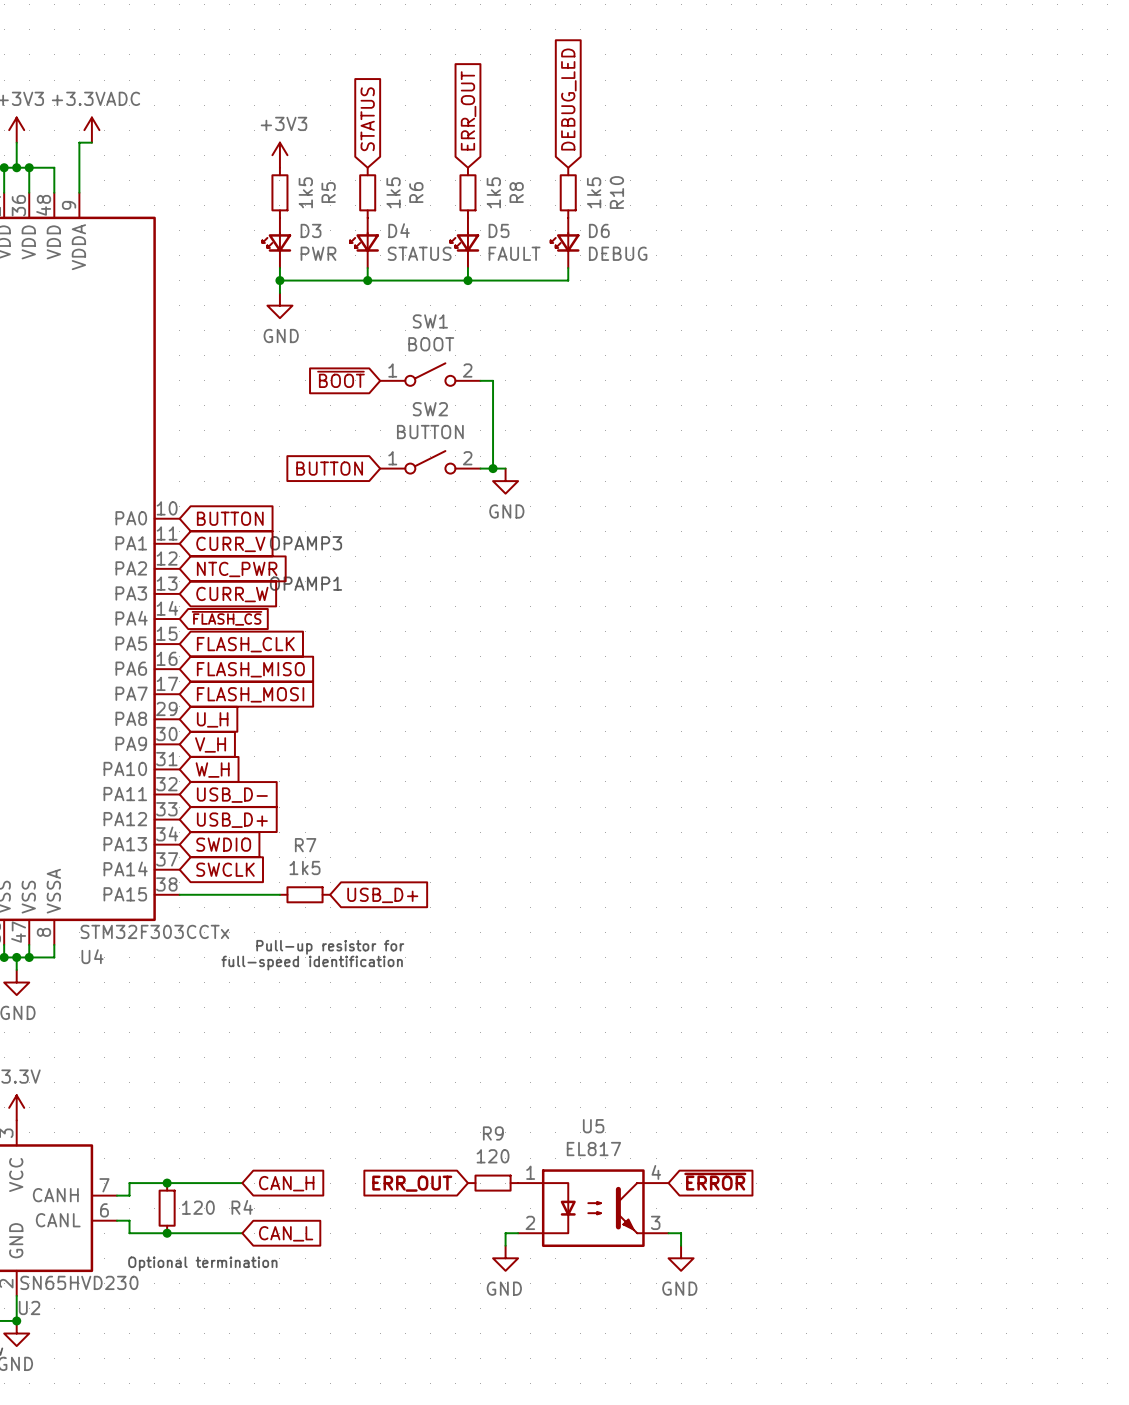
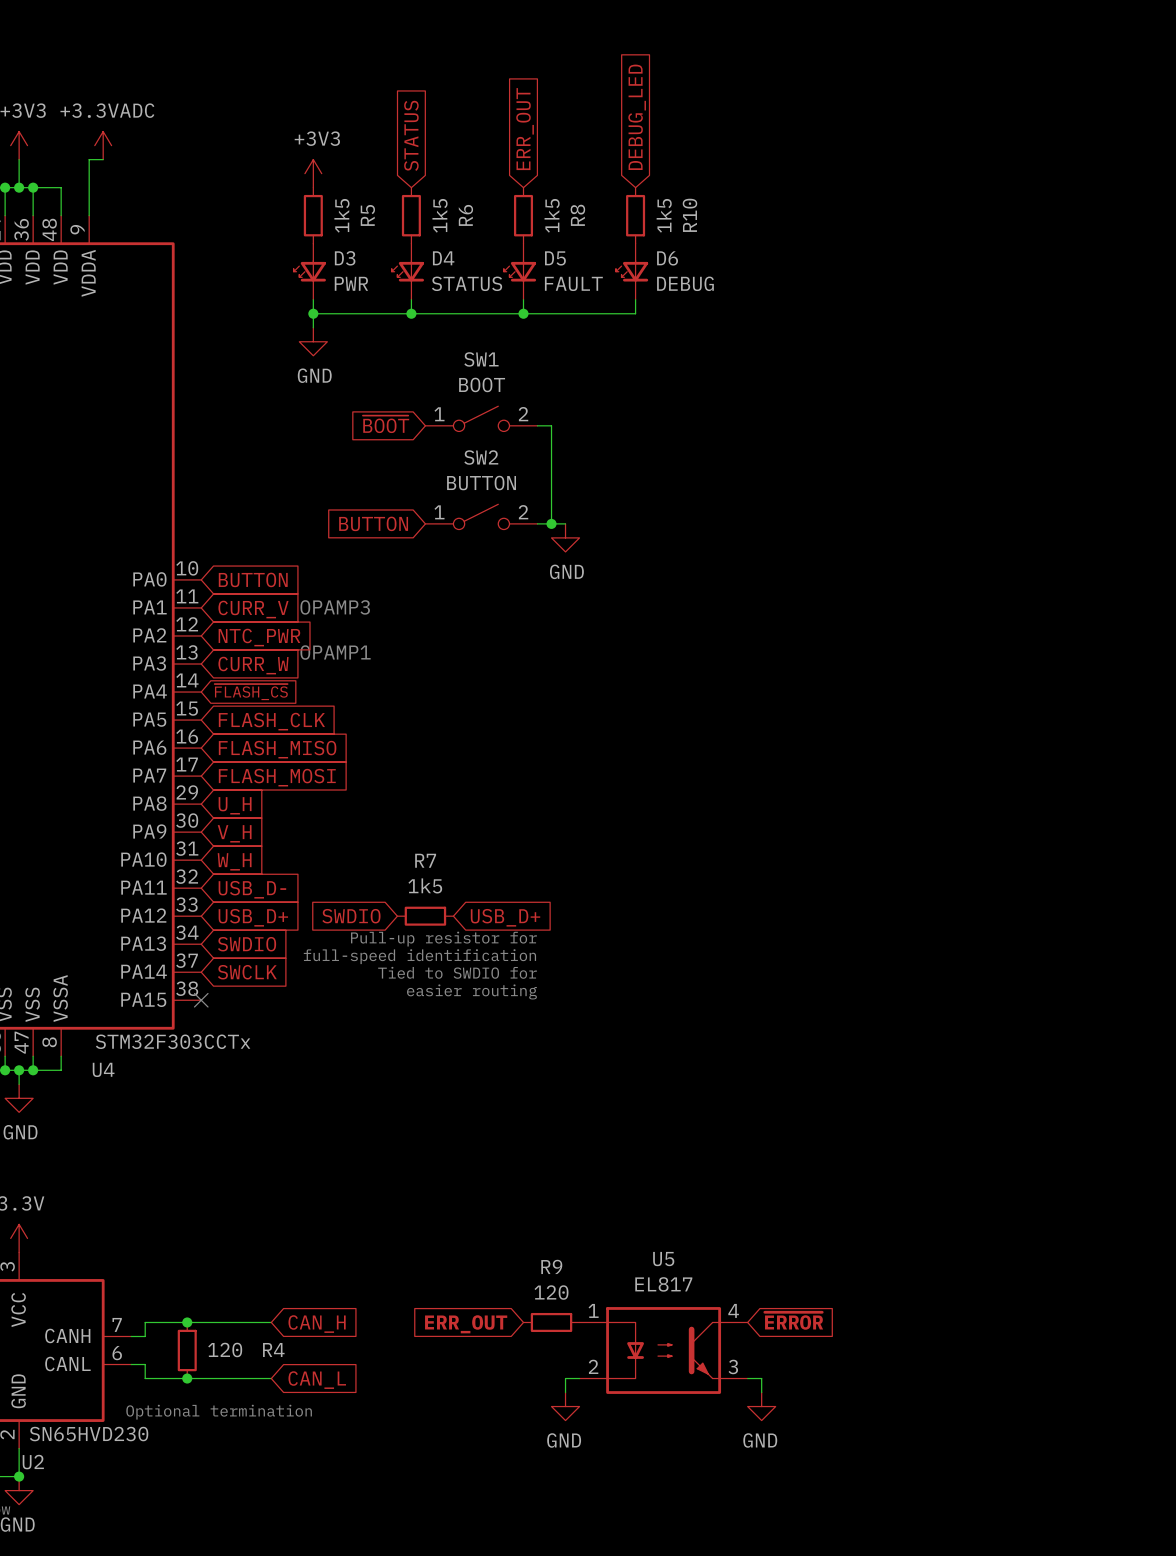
global label: none -> SWDIO (351, 916)
text: none -> Tied to SWDIO for (457, 972)
text: none -> easier routing (471, 991)
wire: (179, 894) (279, 894) -> none
no-connect mark: none -> (201, 1000)
R7 position: (305, 894) -> (425, 916)
global label position: USB_D+ (382, 895) -> USB_D+ (505, 917)
text position: Pull-up resistor for (330, 947) -> Pull-up resistor for (443, 939)
text position: full-speed identification (312, 963) -> full-speed identification (419, 956)

